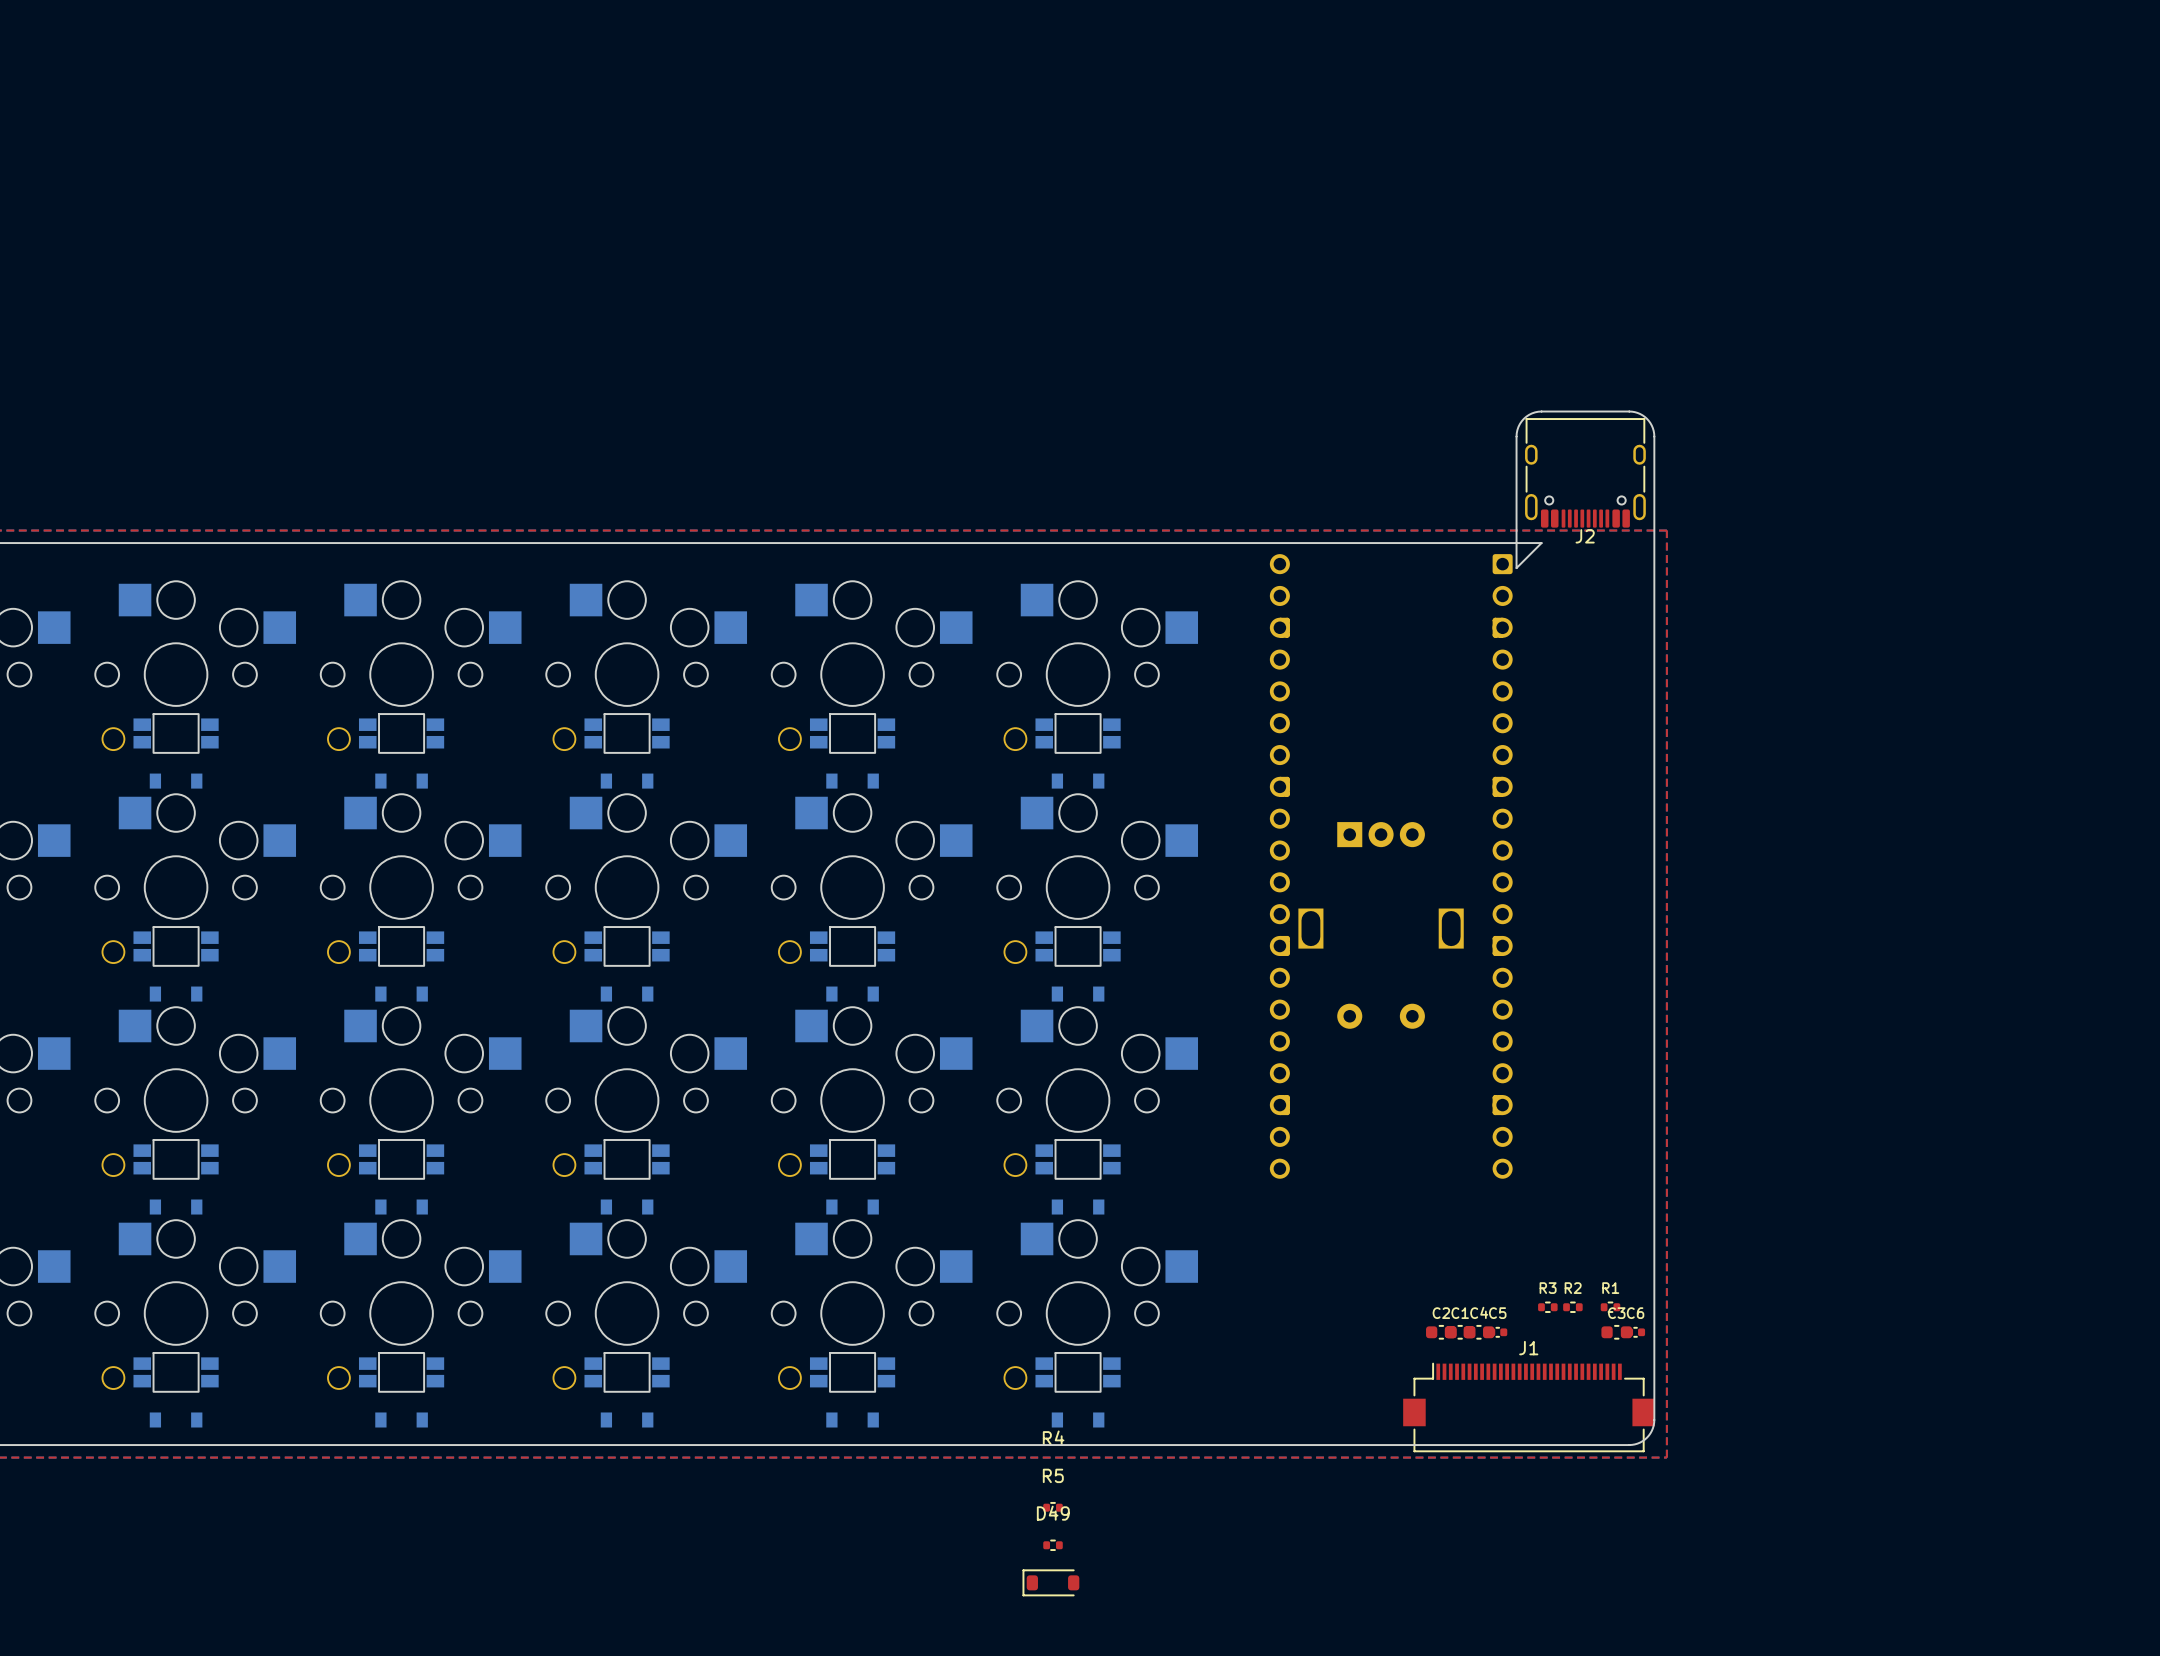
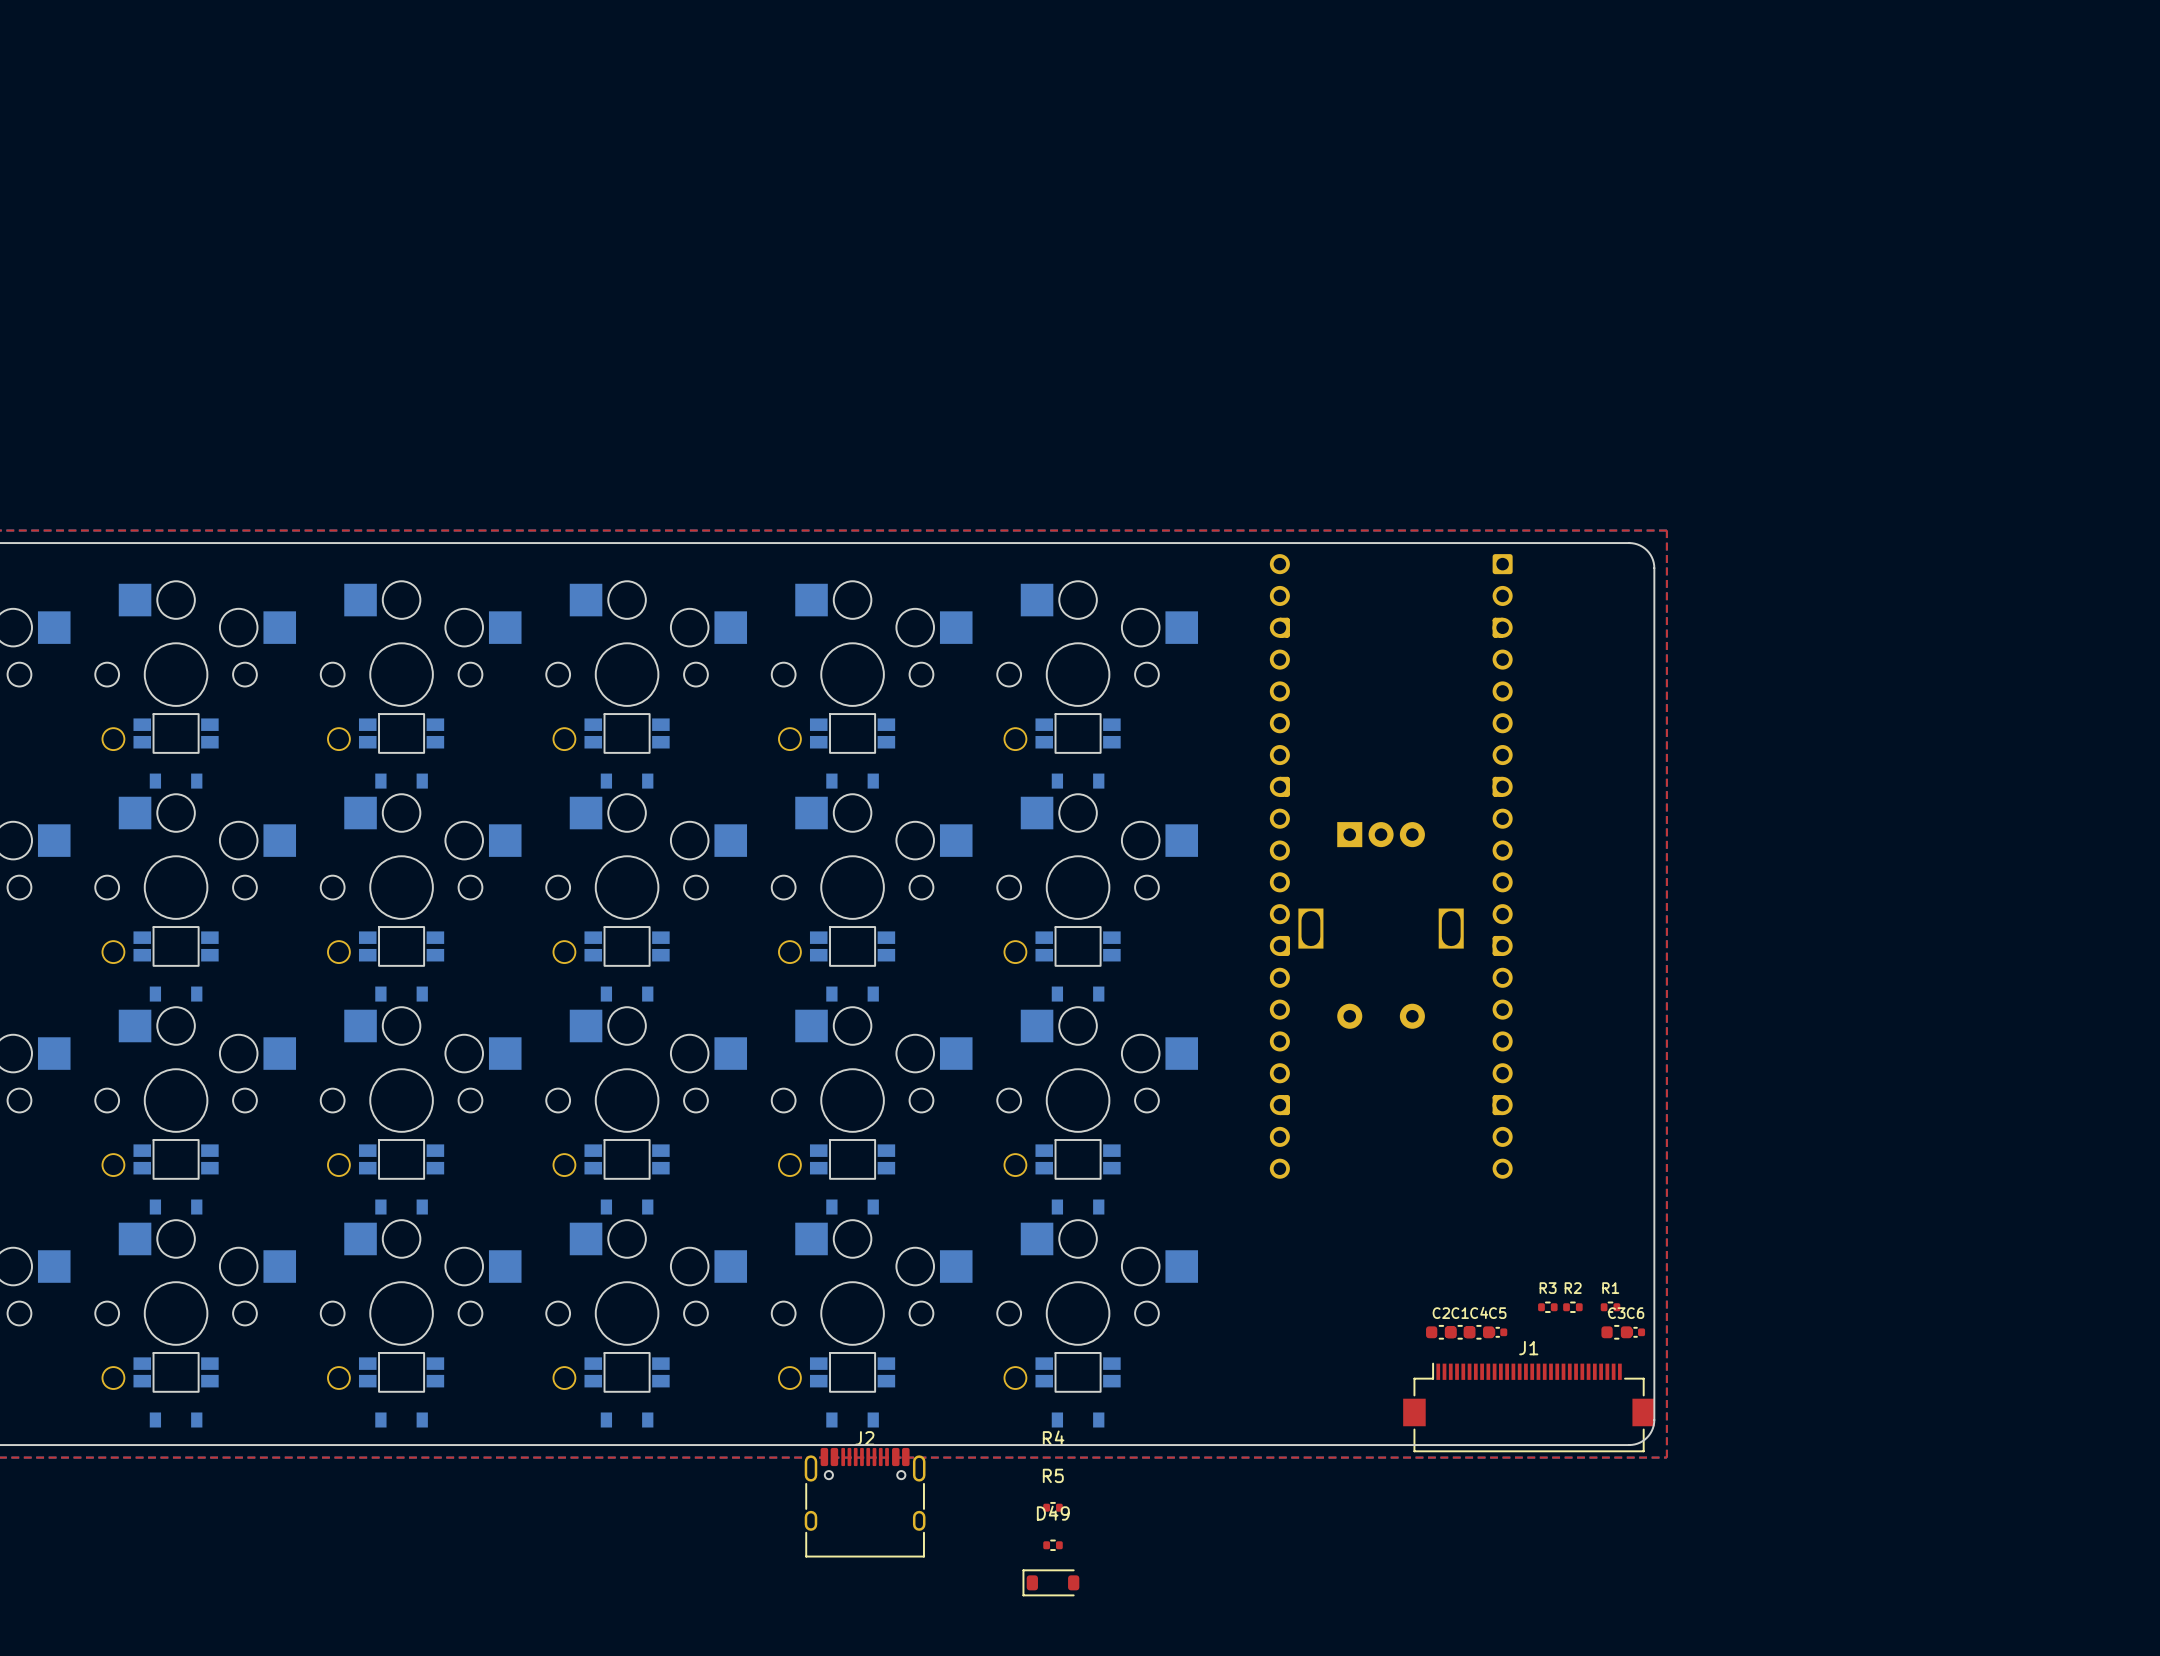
J2 rotation: 0° (1585, 472) -> 180° (865, 1502)
J2 position: (1585, 472) -> (865, 1502)
board edge: (1541, 543) (1516, 568) (1516, 436) (1521, 421) (1529, 414) (1538, 411) (1634, 412) (1648, 420) (1654, 433) (1654, 568) -> (1541, 543) (1634, 543) (1648, 552) (1654, 568)

